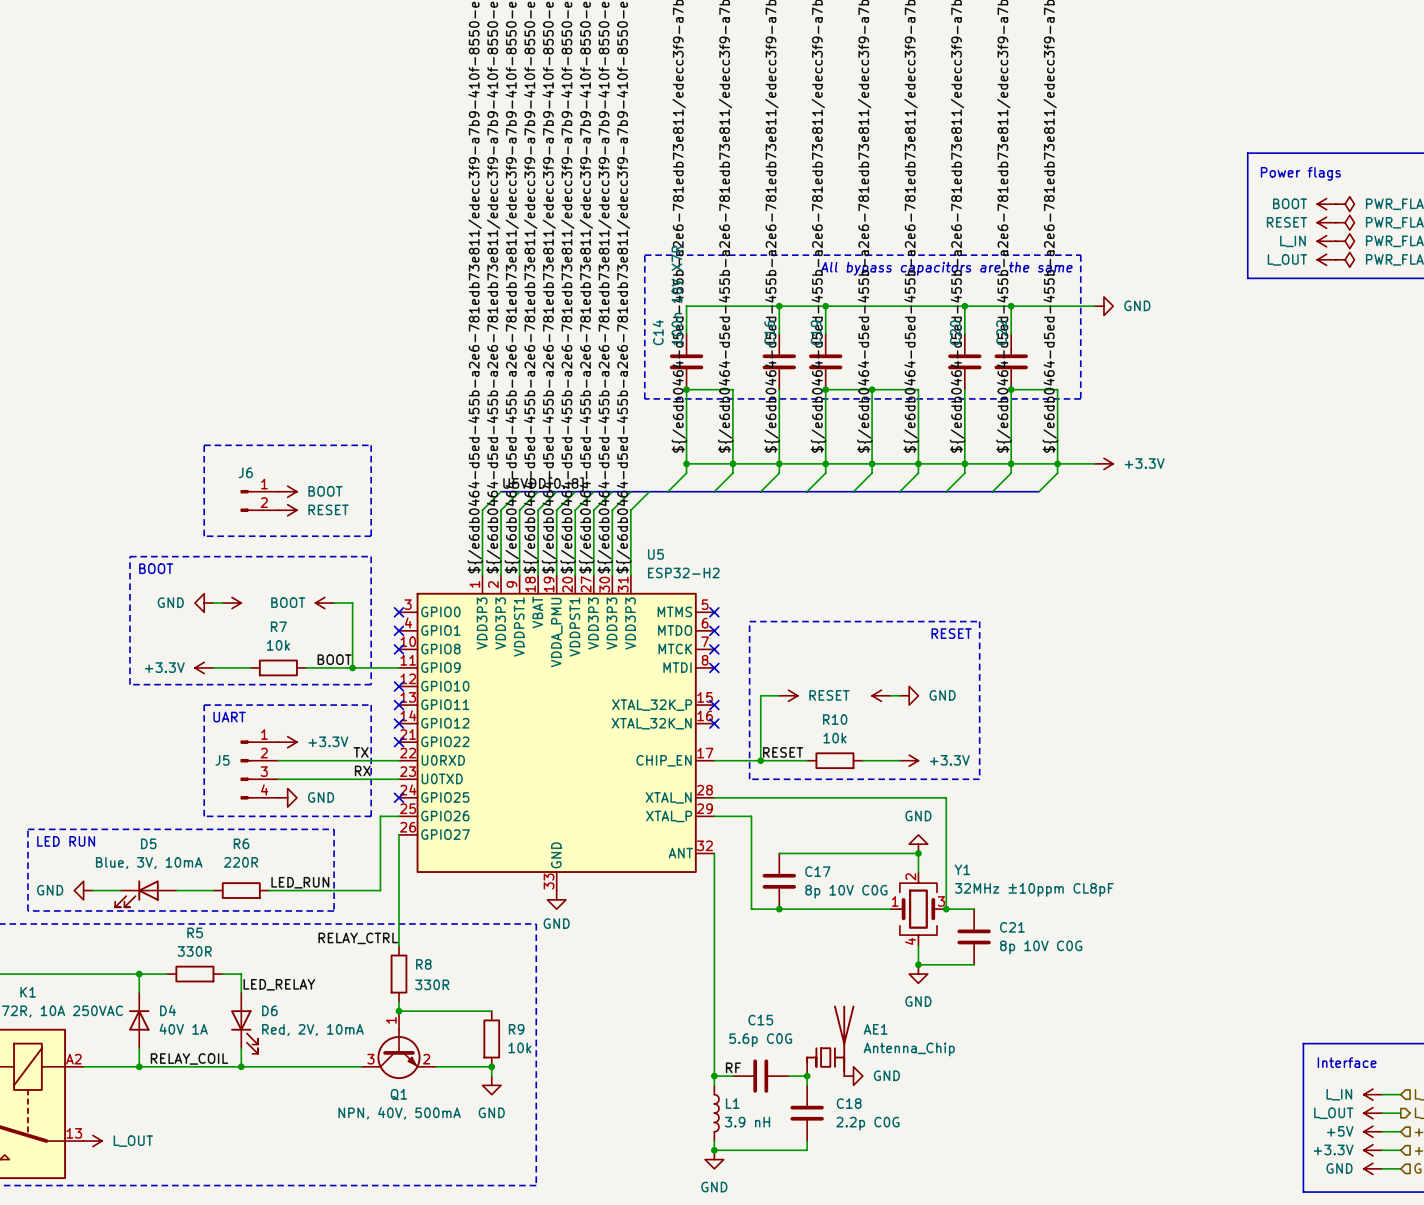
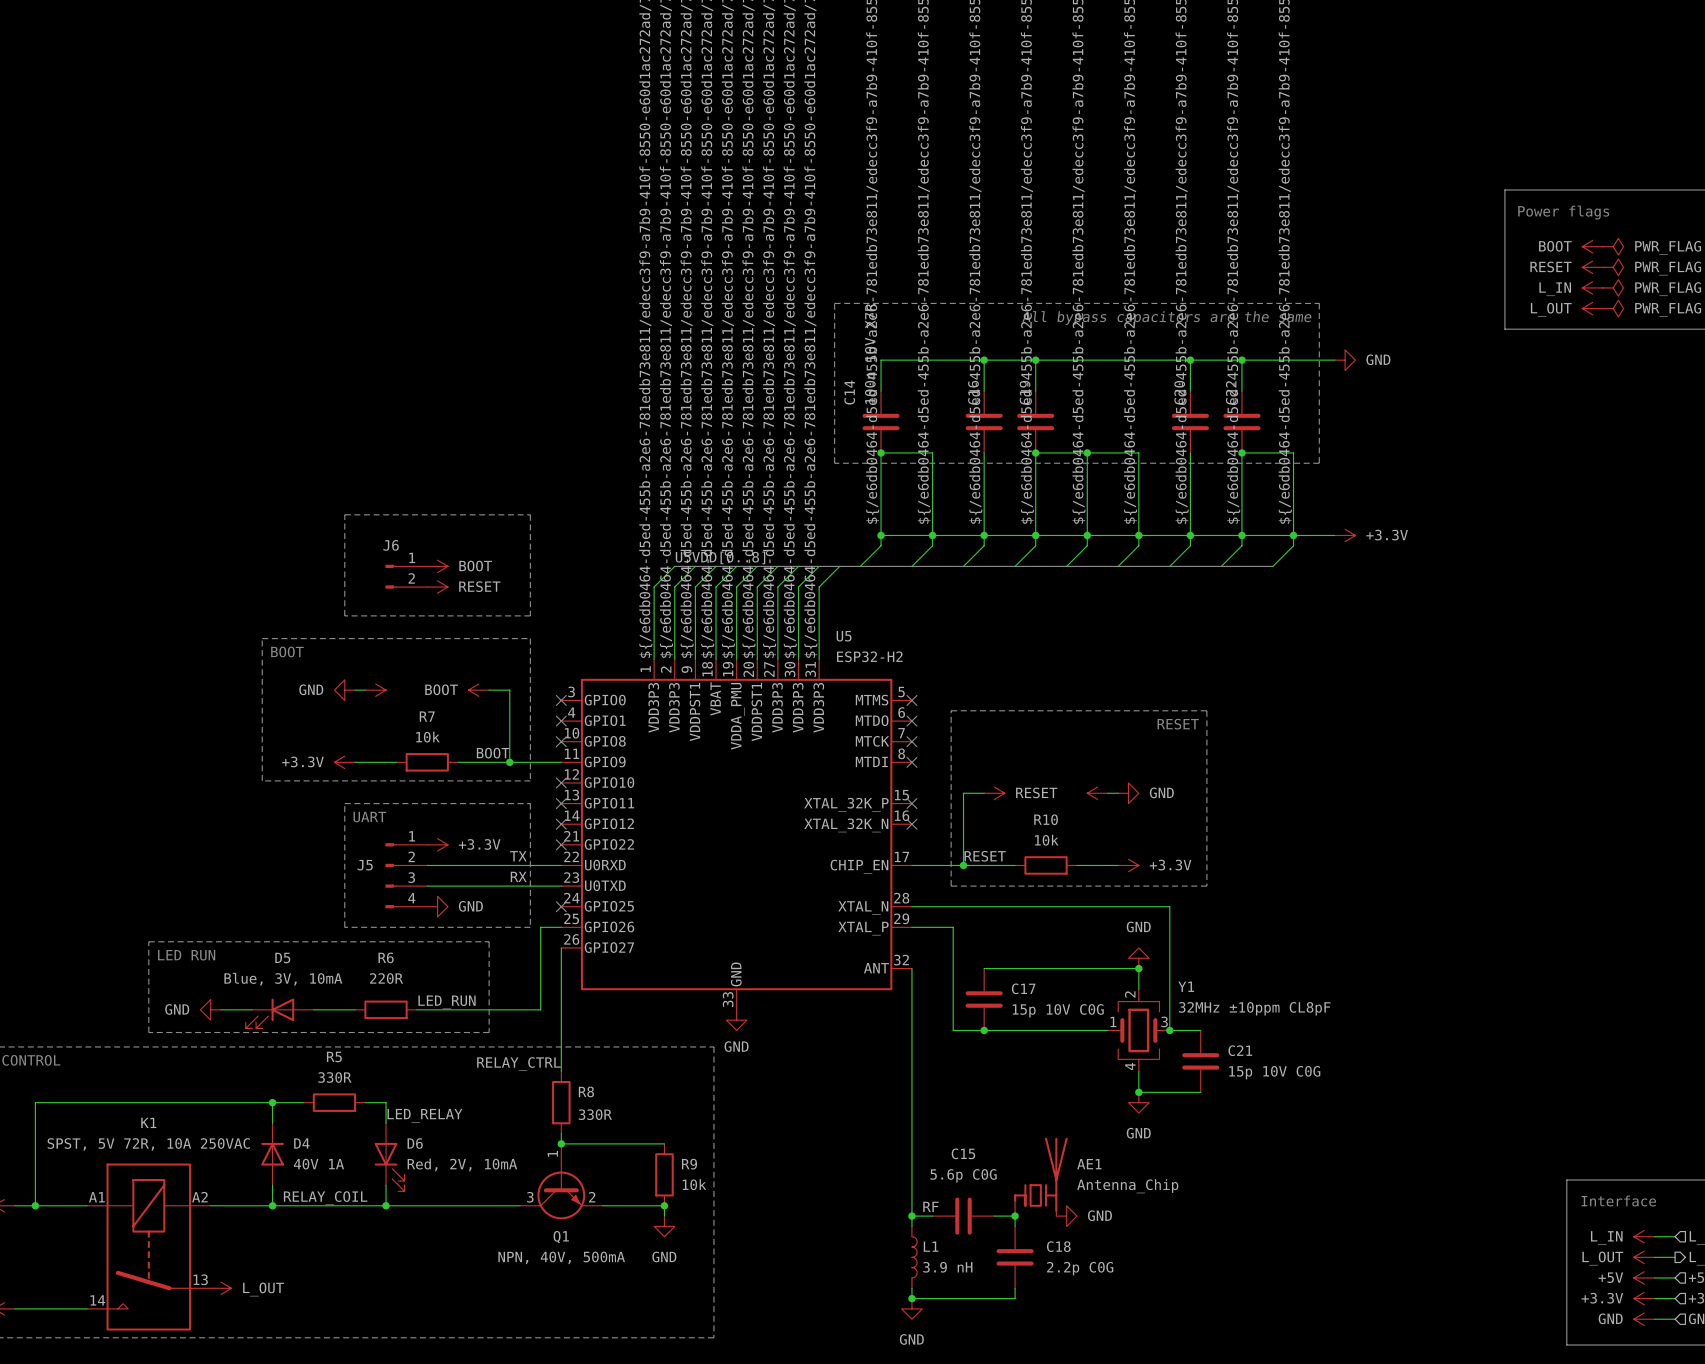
C17 value: 8p 10V C0G (846, 891) -> 15p 10V C0G (1058, 1010)
C21 value: 8p 10V C0G (1041, 947) -> 15p 10V C0G (1274, 1072)

